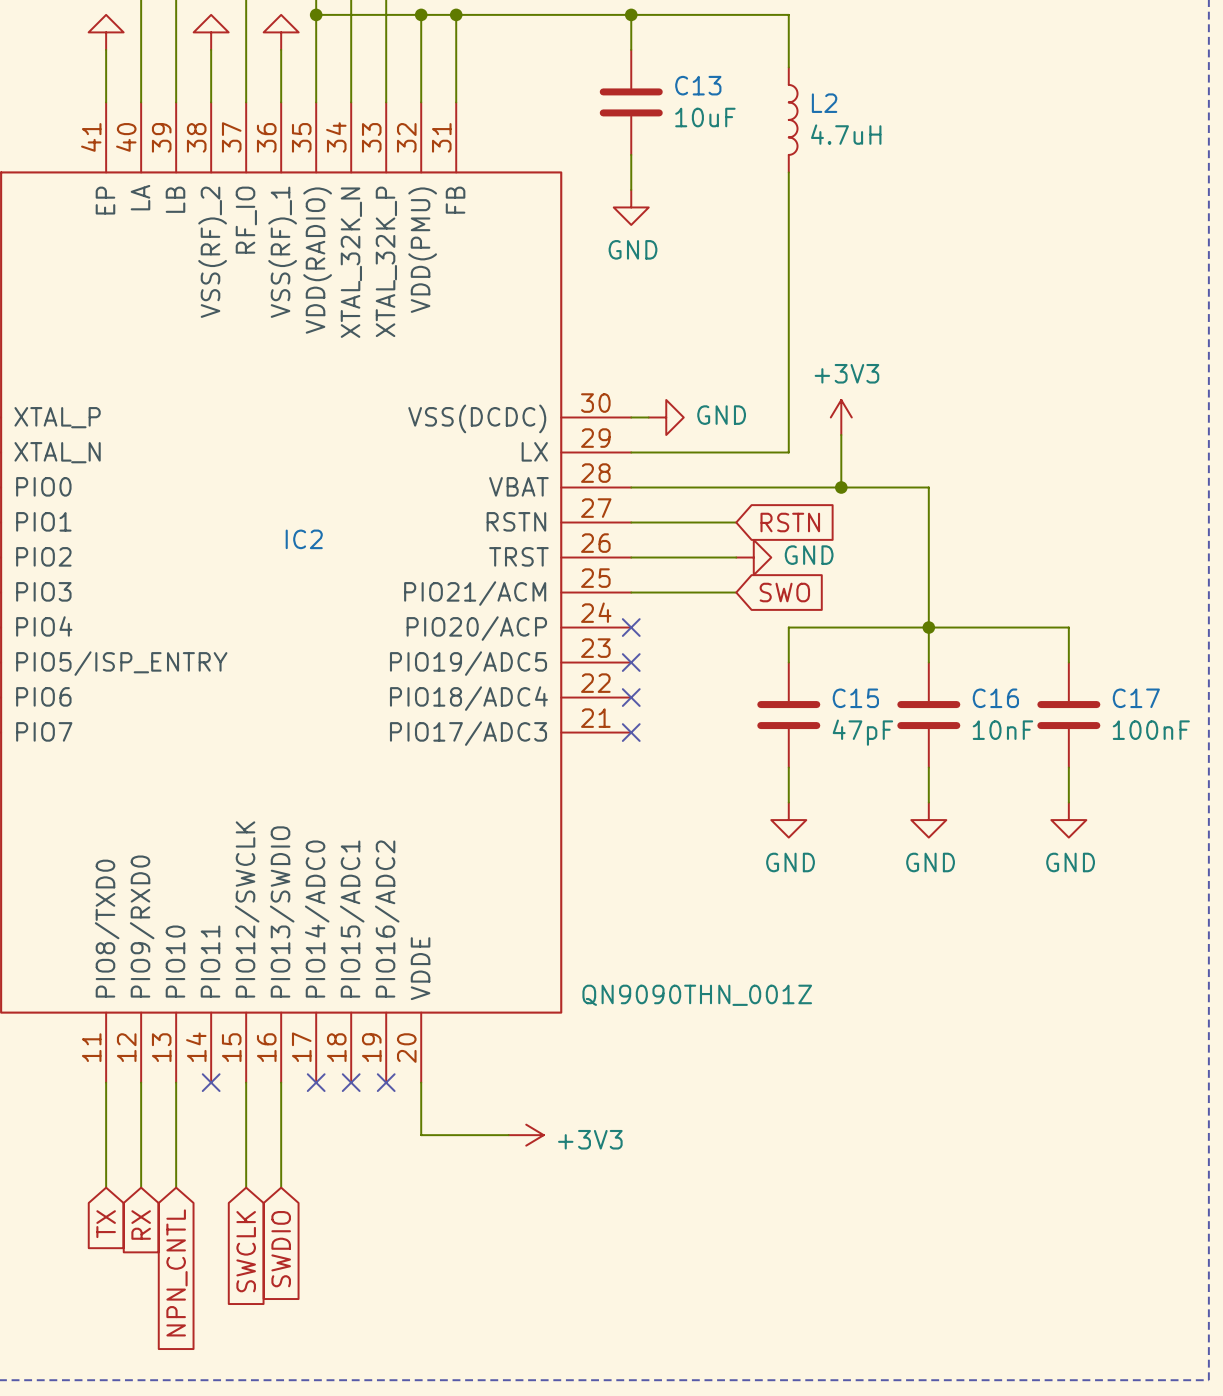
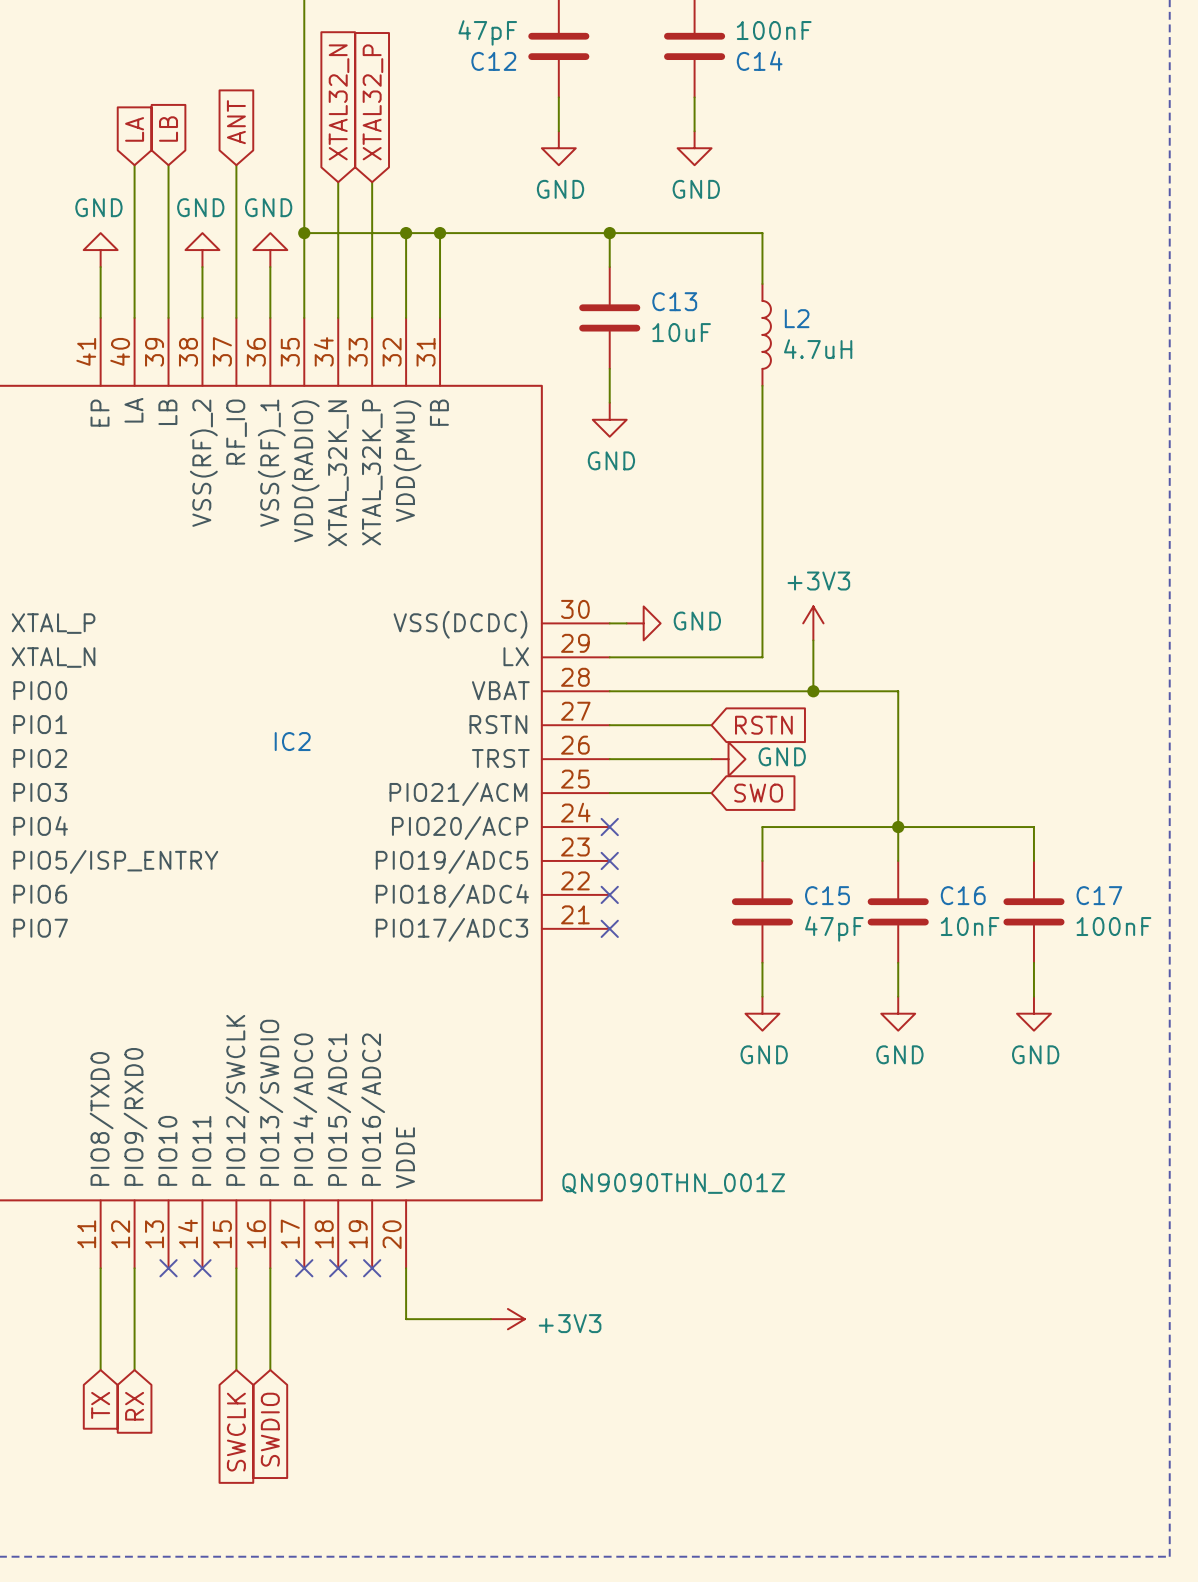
wire: (176, 1082) (176, 1187) -> none
no-connect mark: none -> (168, 1268)
global label: NPN_CNTL (176, 1272) -> none

